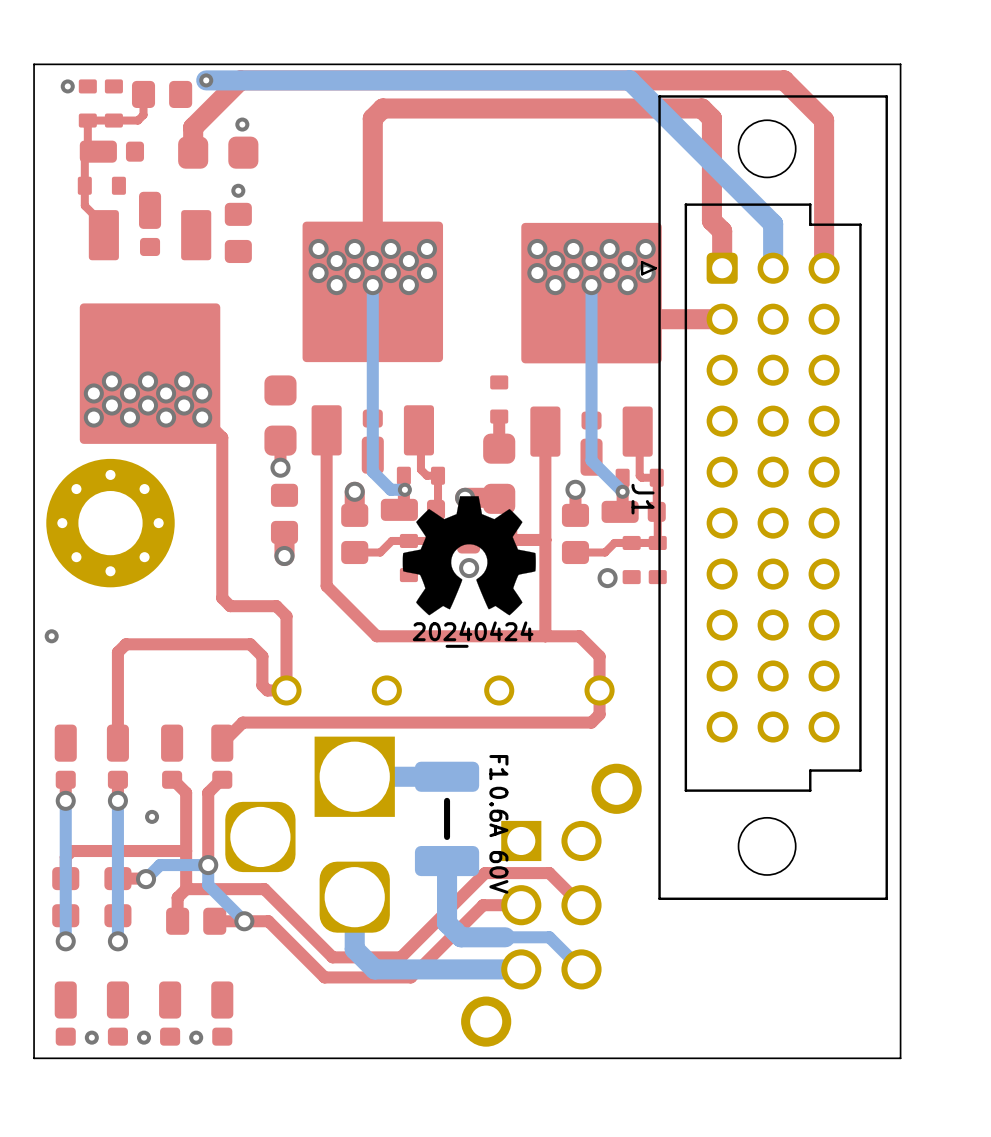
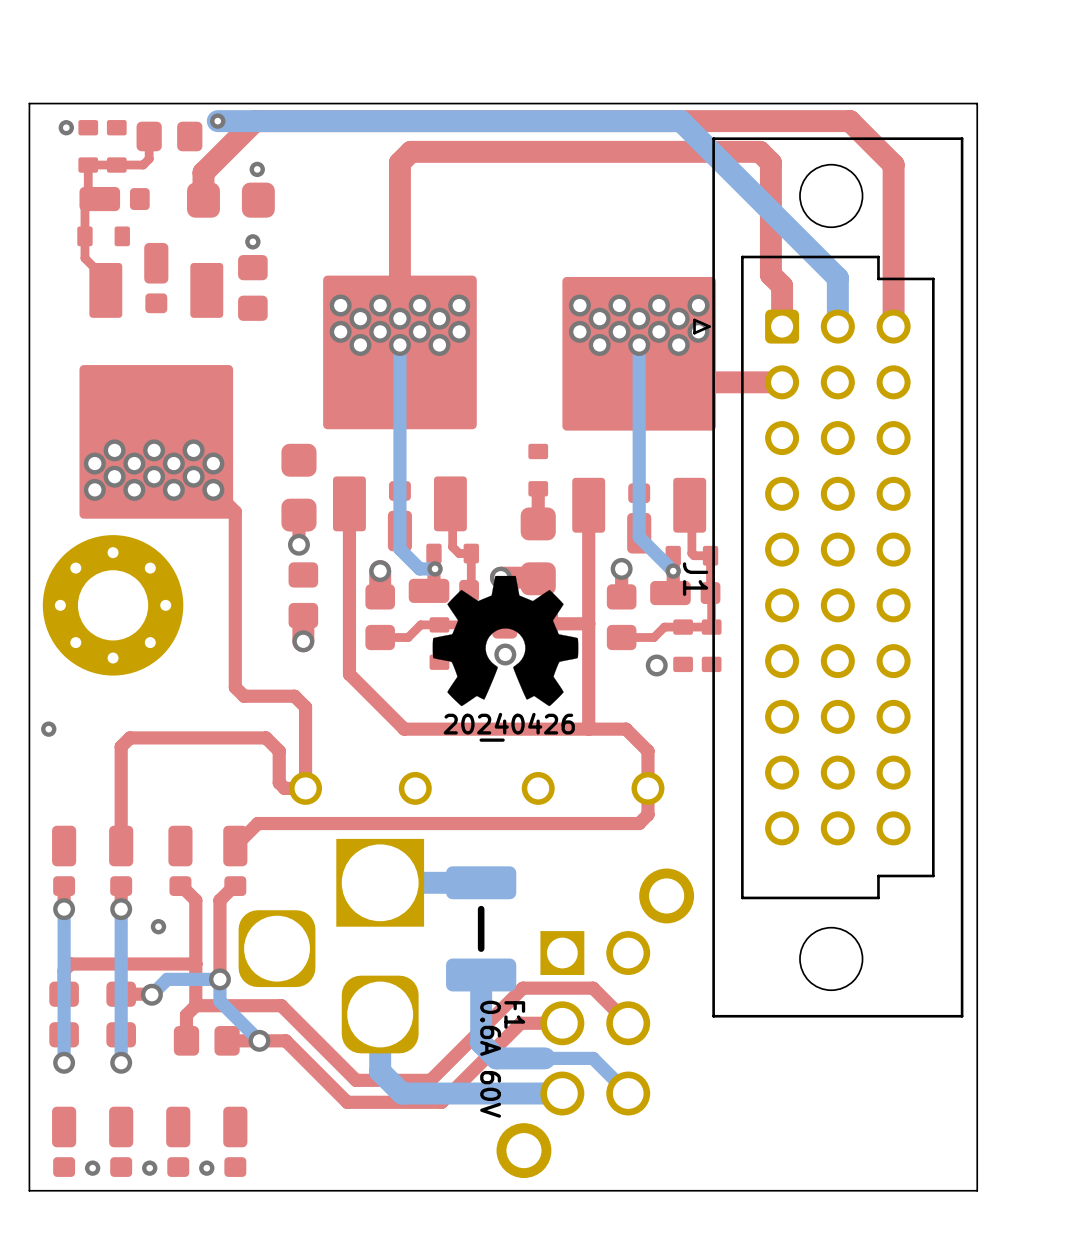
drawing shape: [412, 621, 534, 648] -> [443, 712, 575, 742]
F1 name position: F1 (498, 767) -> F1 (514, 1014)
F1 value position: 0.6A 60V (498, 840) -> 0.6A 60V (490, 1059)

